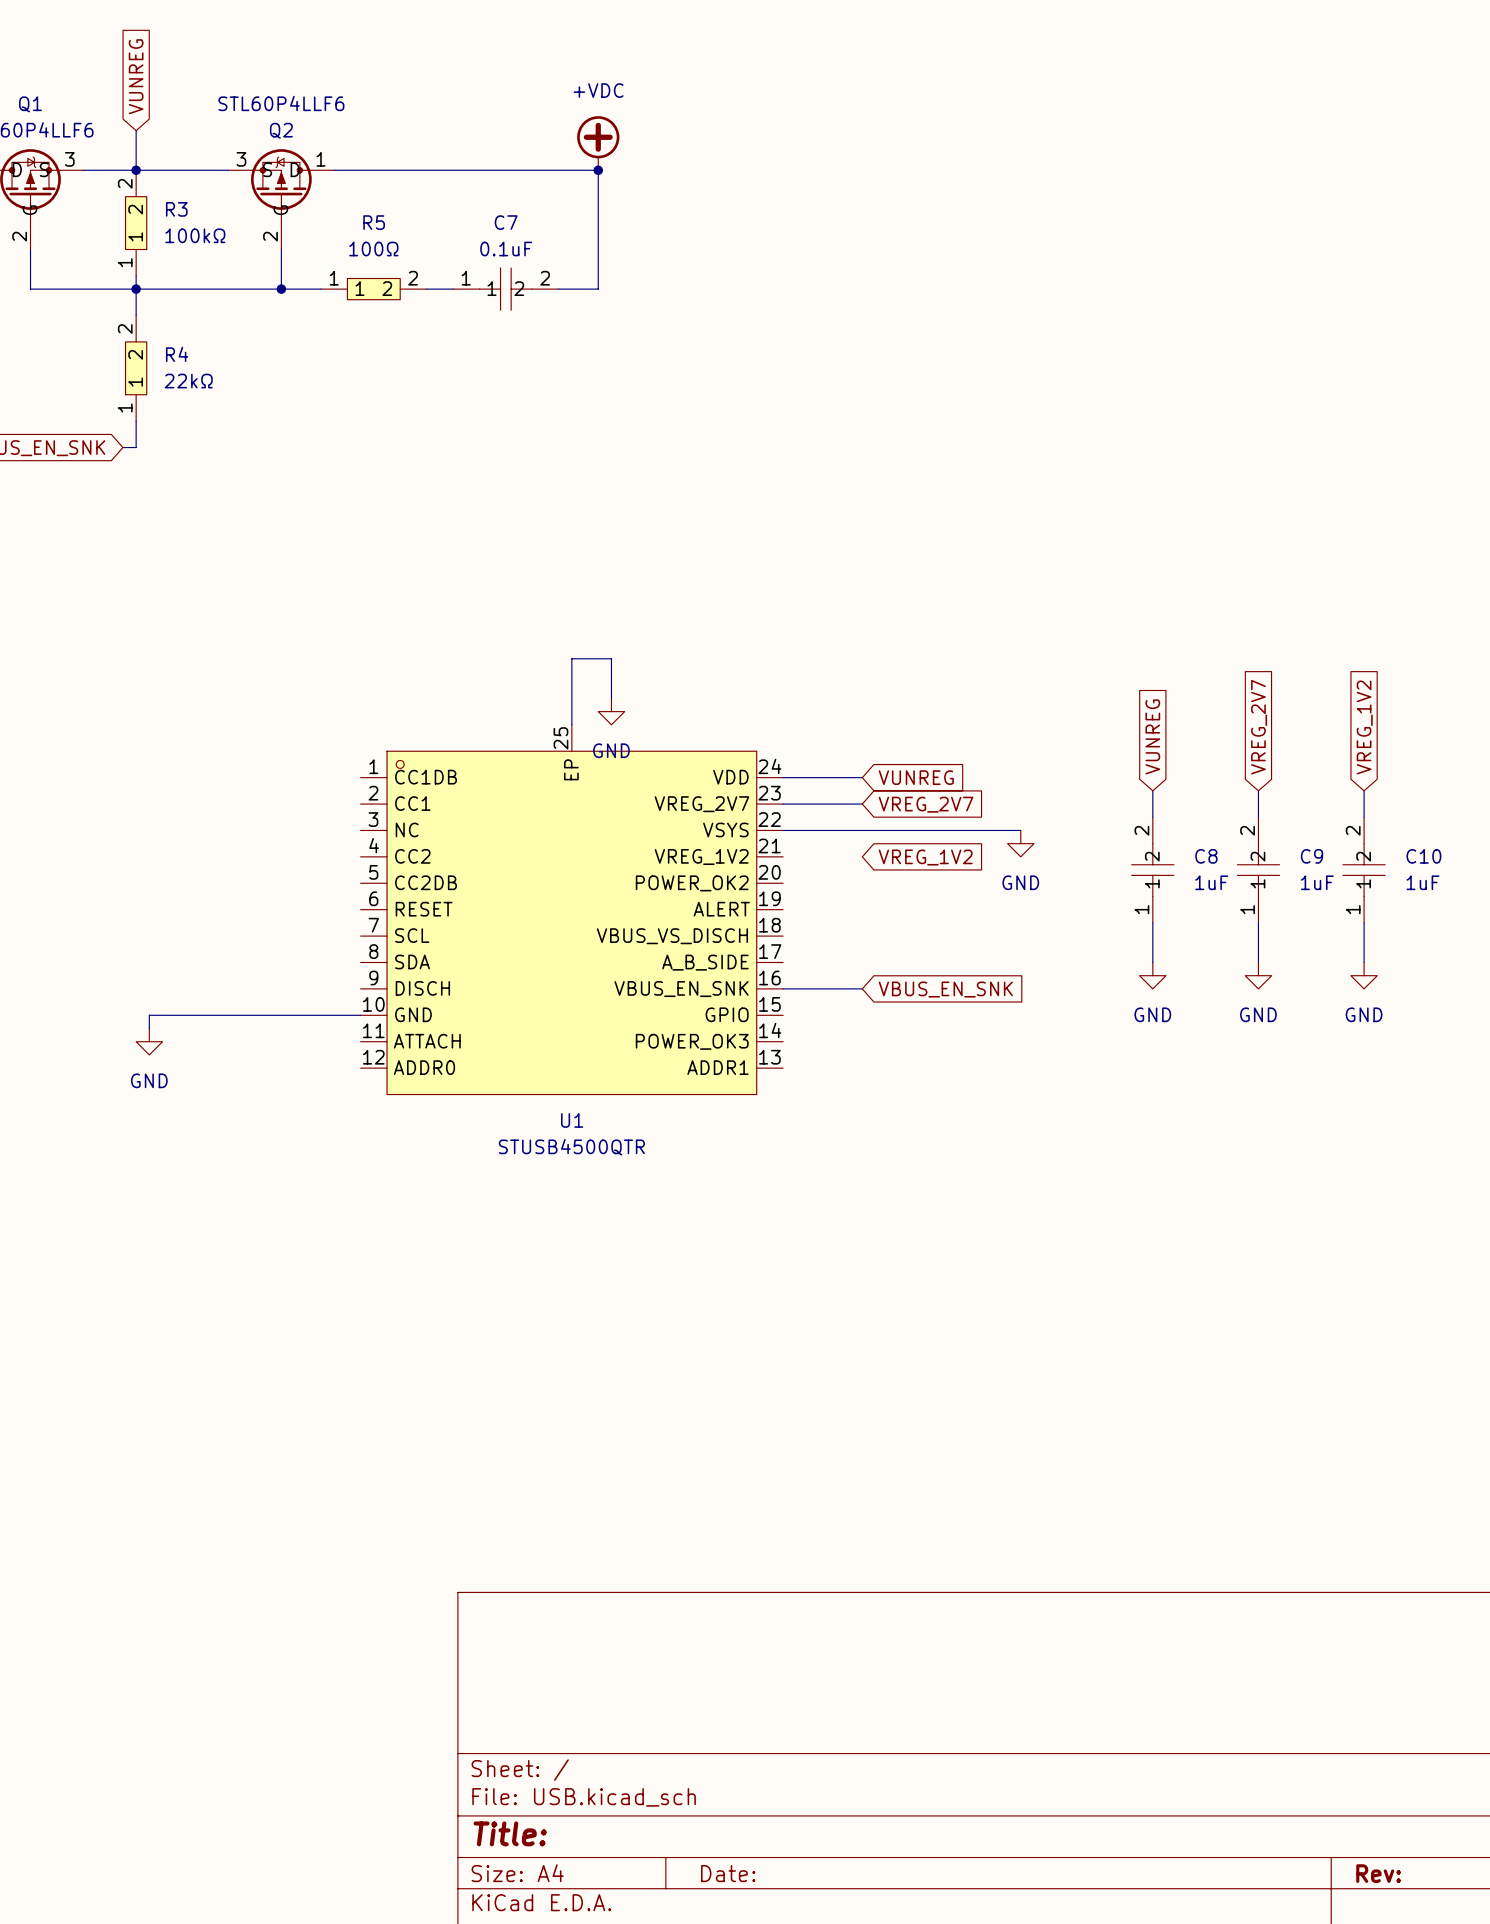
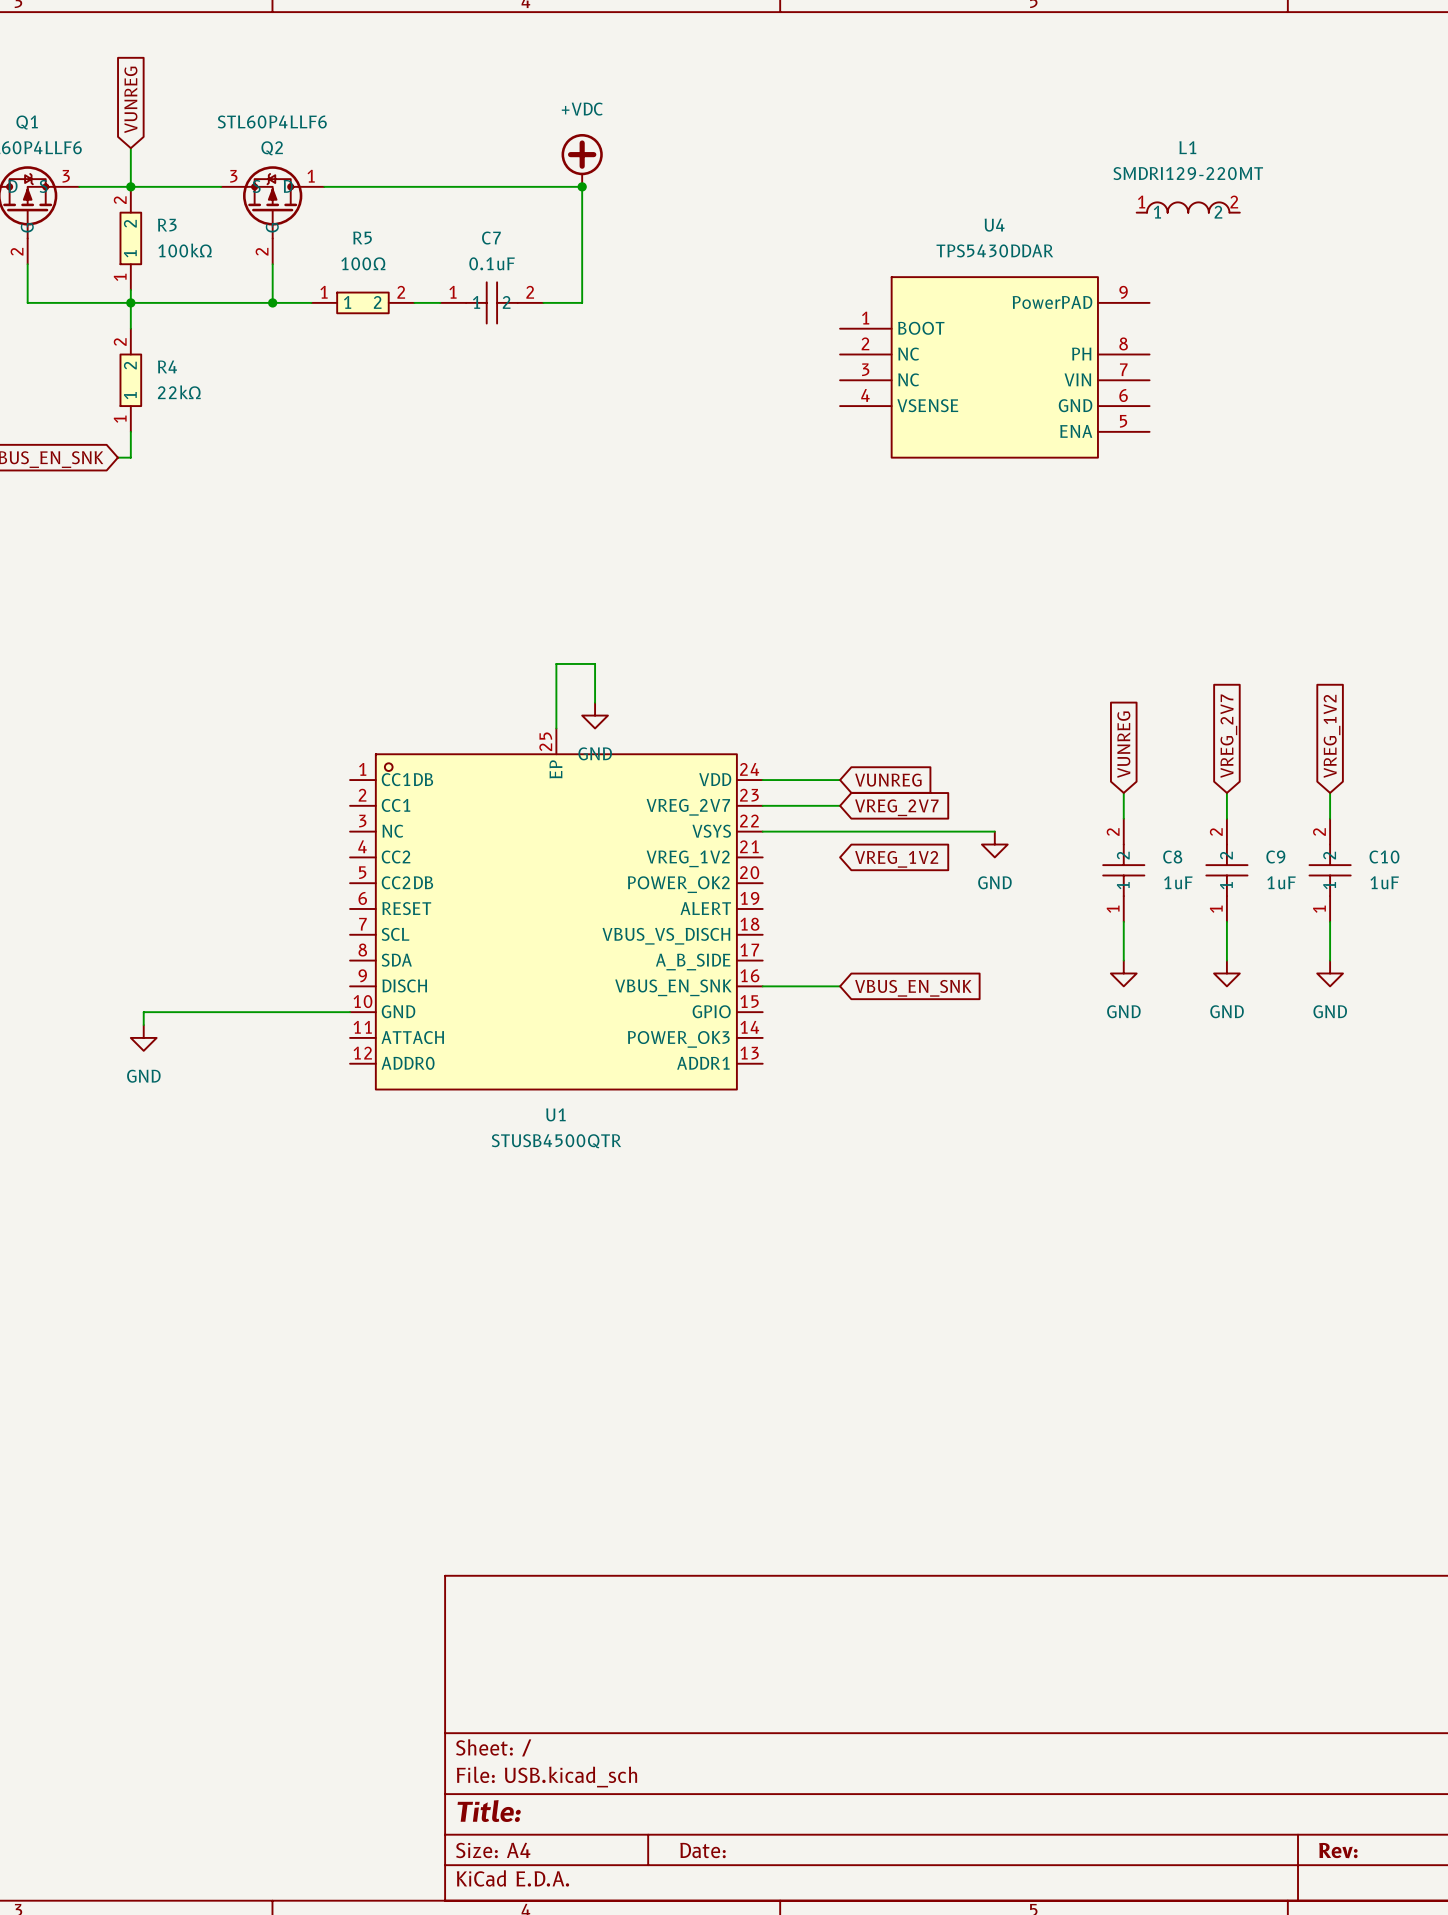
L1: none -> SMDRI129-220MT (1188, 207)
U4: none -> TPS5430DDAR (994, 367)

